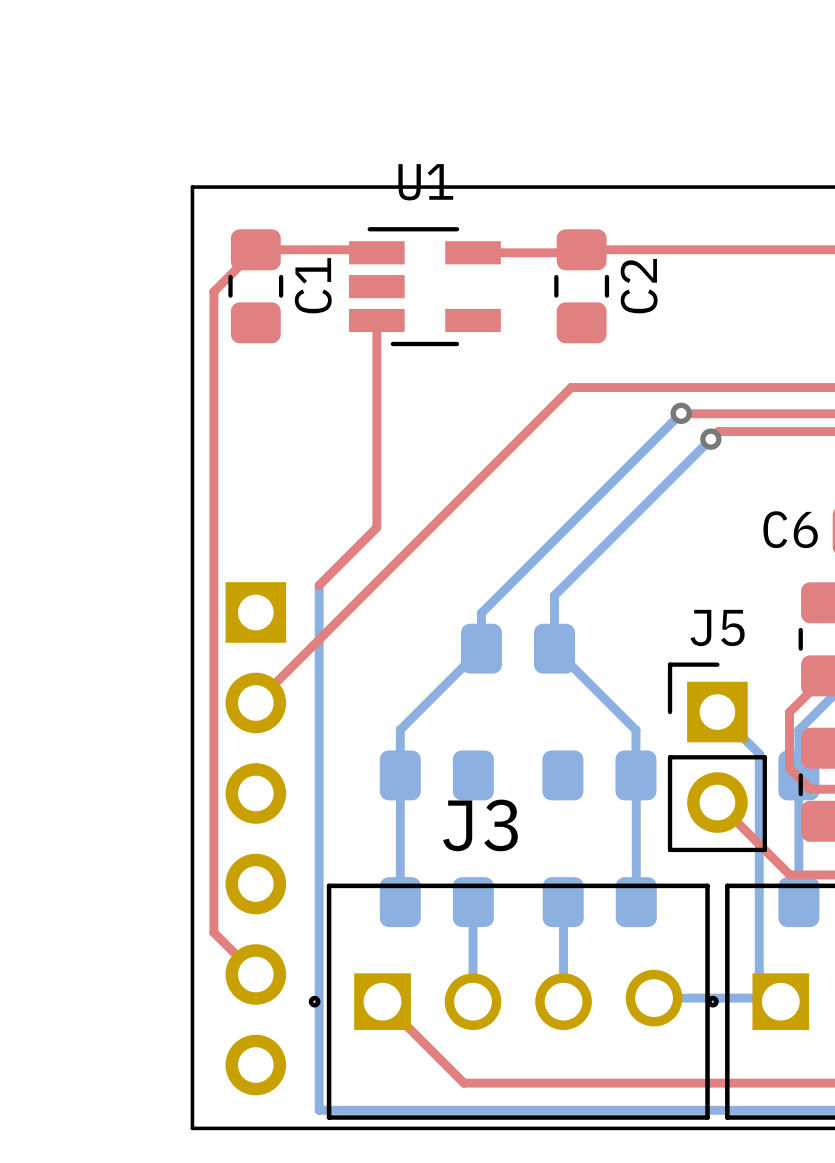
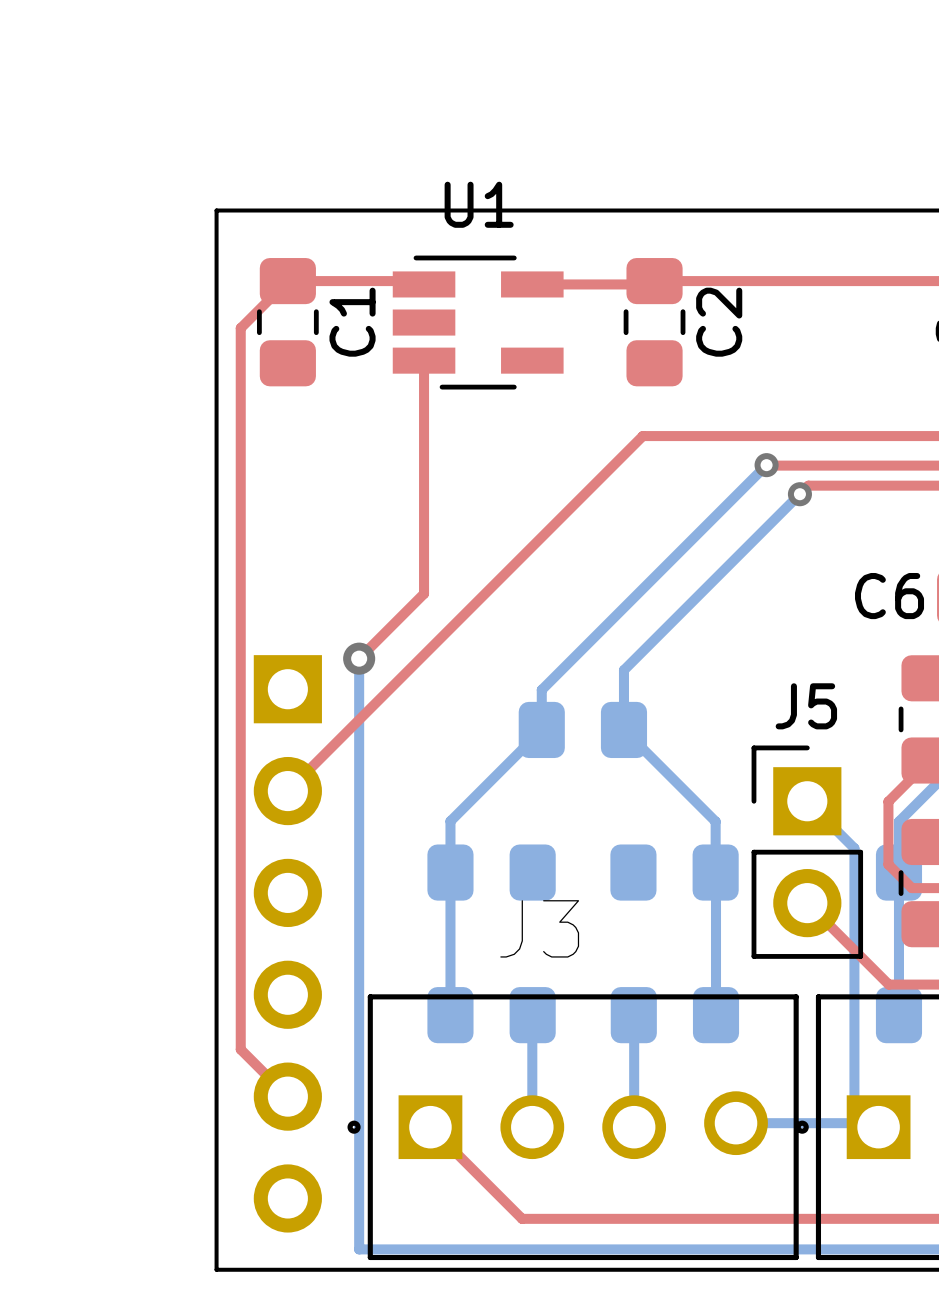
via: none -> (359, 658)

